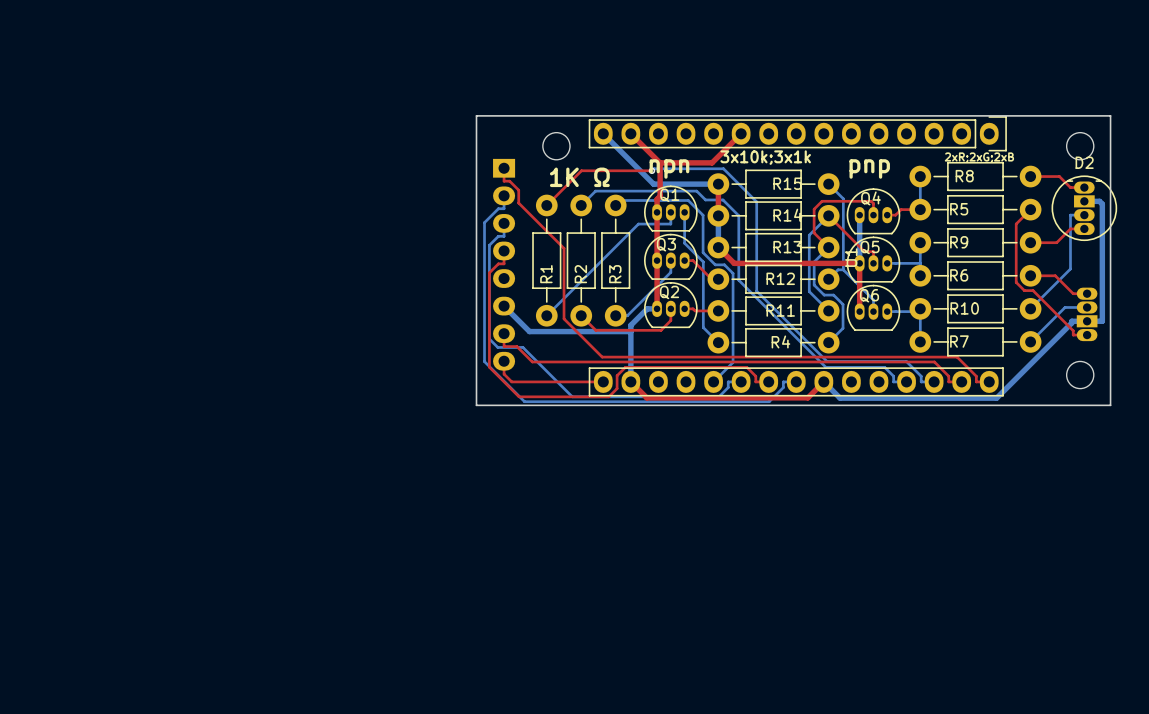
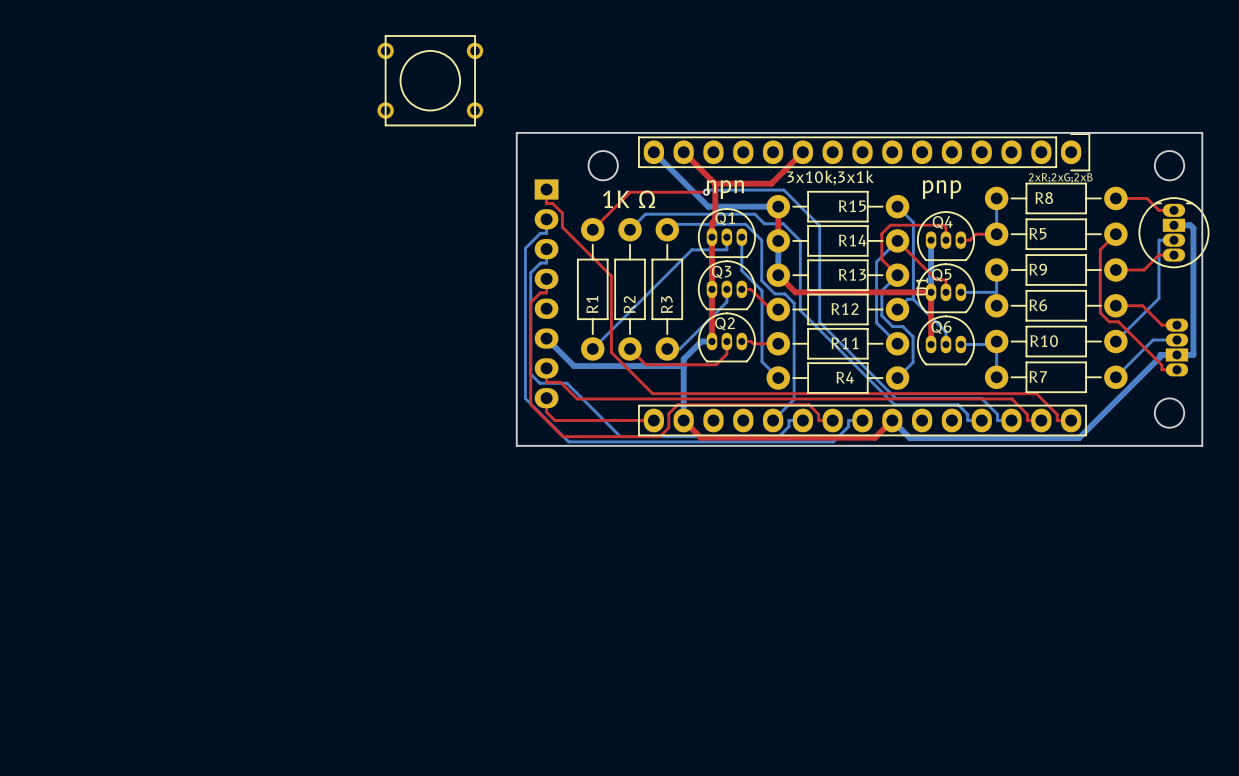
part: none -> (430, 80)
D2 name: D2 (1084, 162) -> none

